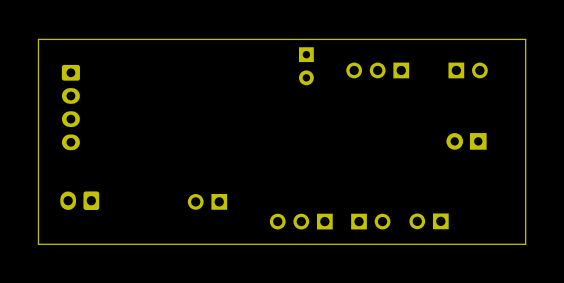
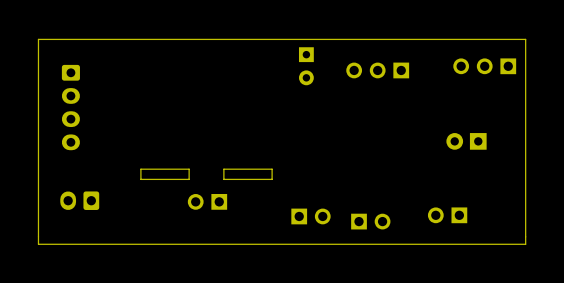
part: none -> (484, 66)
part: (468, 70) -> none
board edge: none -> (189, 169) (140, 169) (140, 179) (189, 179) (189, 169)
board edge: none -> (272, 169) (223, 169) (223, 179) (272, 179) (272, 169)
part: none -> (310, 216)
part: (301, 221) -> none
part position: (429, 221) -> (447, 215)

